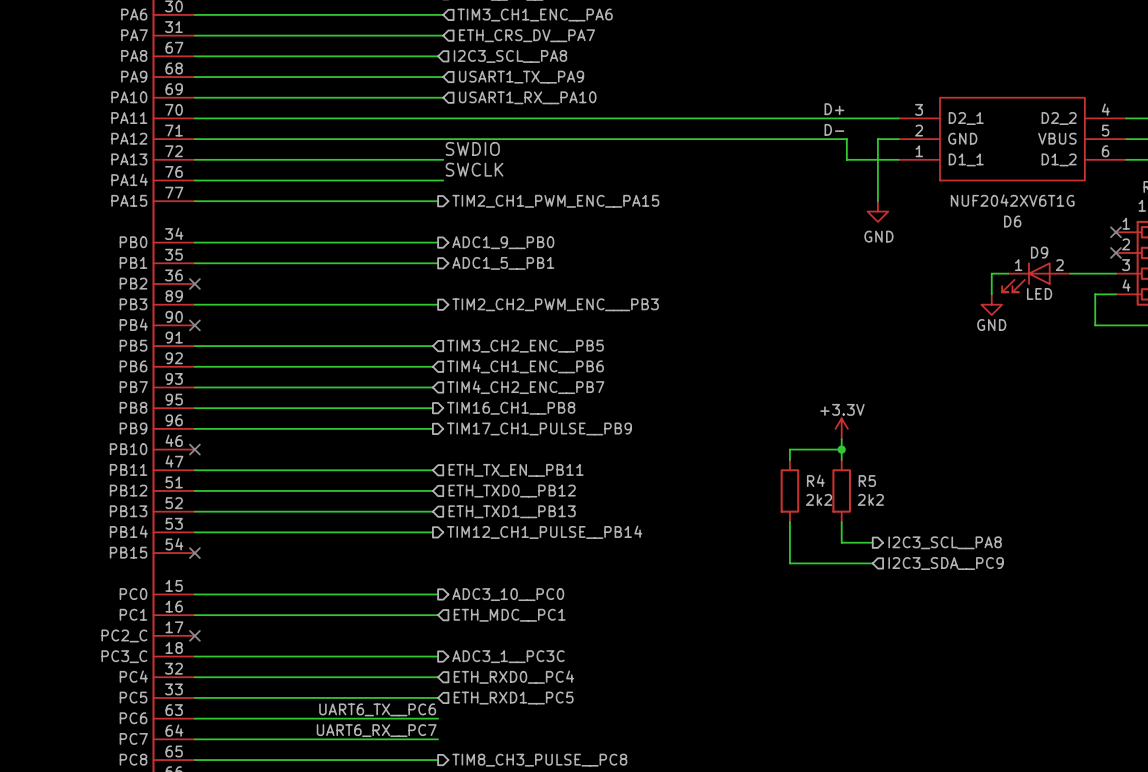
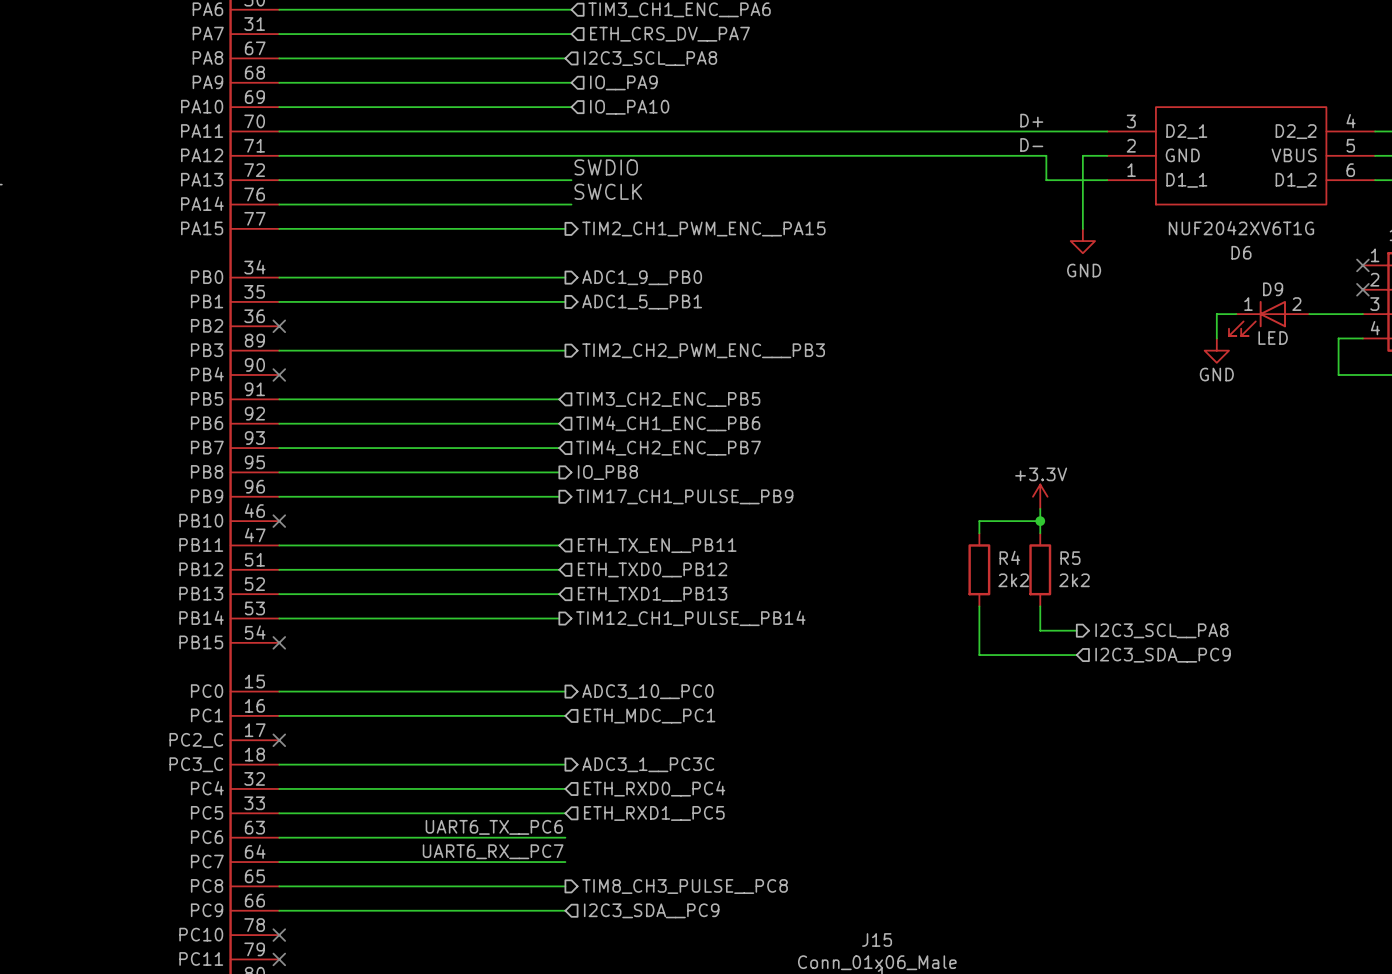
hierarchical label: USART1_TX__PA9 (521, 77) -> IO__PA9 (623, 82)
hierarchical label: USART1_RX__PA10 (527, 97) -> IO__PA10 (629, 107)
hierarchical label: TIM16_CH1__PB8 (511, 408) -> IO_PB8 (607, 472)

